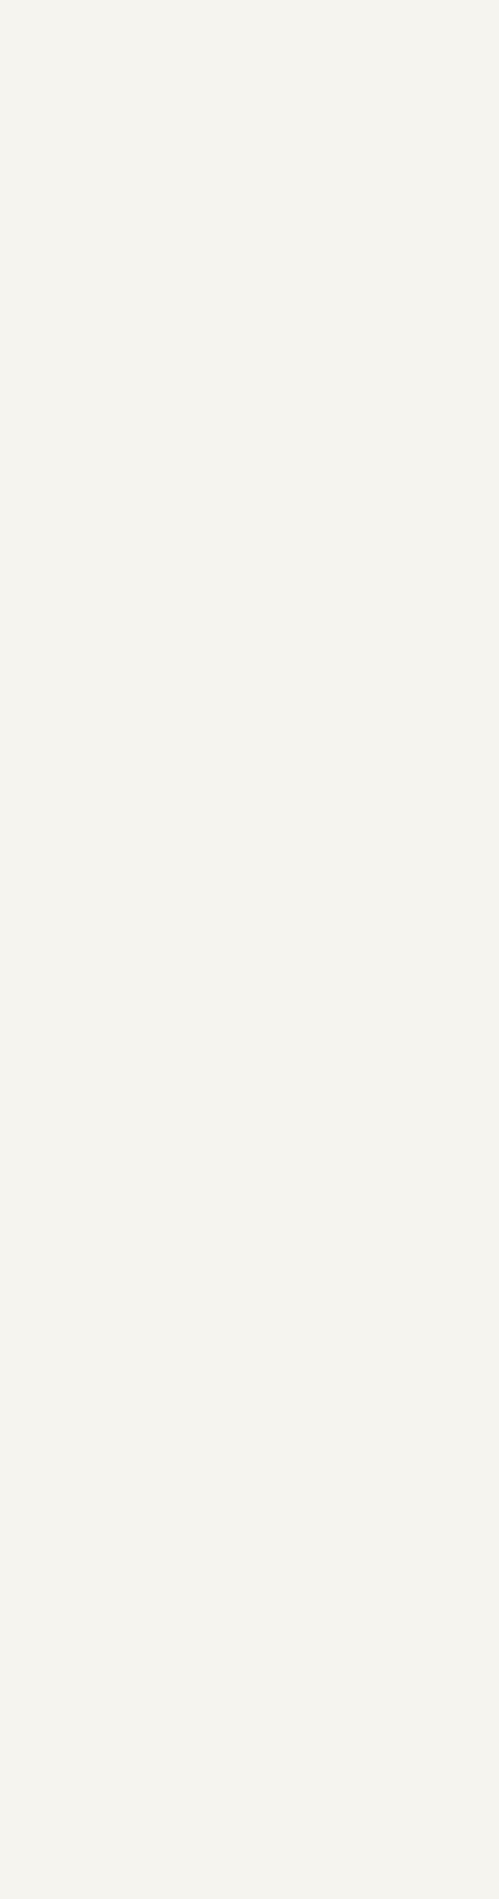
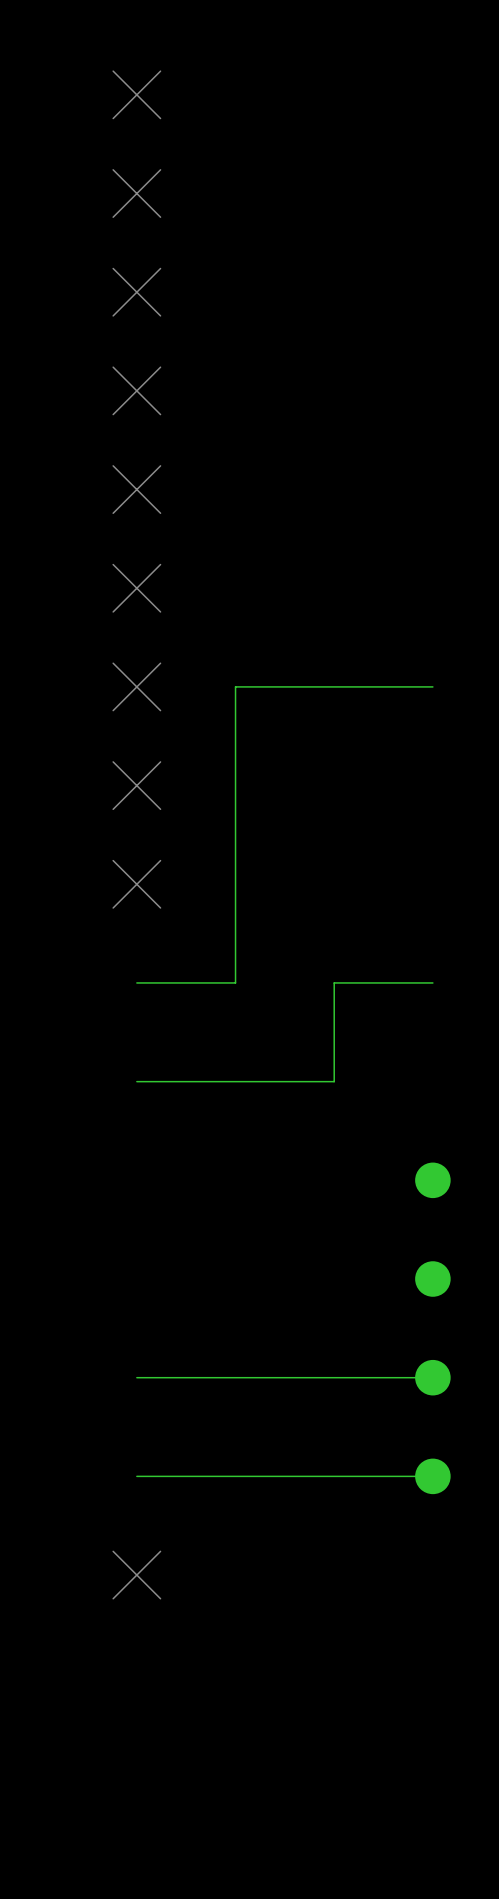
no-connect mark: none -> (136, 94)
no-connect mark: none -> (136, 193)
no-connect mark: none -> (136, 292)
no-connect mark: none -> (136, 390)
no-connect mark: none -> (136, 489)
no-connect mark: none -> (136, 588)
no-connect mark: none -> (136, 686)
wire: none -> (432, 686) (235, 686) (235, 982) (136, 982)
no-connect mark: none -> (136, 785)
no-connect mark: none -> (136, 884)
wire: none -> (432, 982) (334, 982) (334, 1081) (136, 1081)
junction: none -> (432, 1180)
junction: none -> (432, 1279)
wire: none -> (136, 1377) (432, 1377)
junction: none -> (432, 1377)
wire: none -> (136, 1476) (432, 1476)
junction: none -> (432, 1476)
no-connect mark: none -> (136, 1575)

